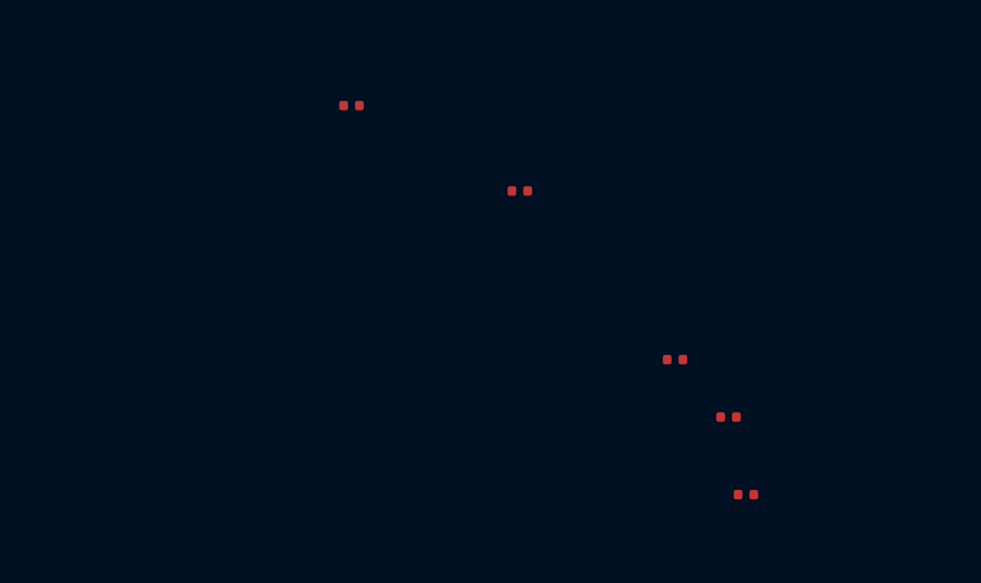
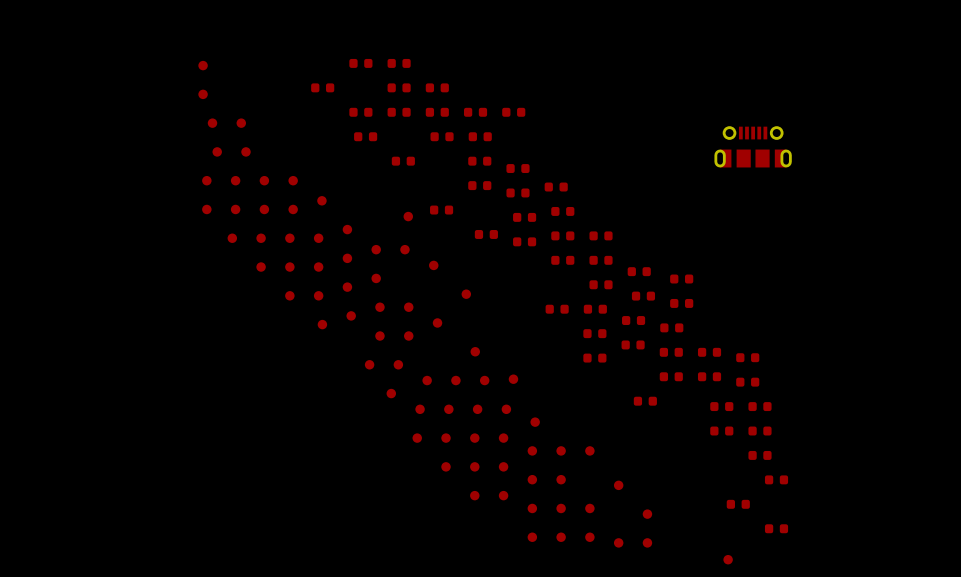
part: none -> (360, 63)
part: none -> (399, 63)
part: none -> (203, 65)
part: none -> (322, 87)
part: none -> (399, 87)
part: none -> (437, 87)
part: none -> (203, 94)
part: none -> (360, 112)
part: none -> (399, 112)
part: none -> (437, 112)
part: none -> (475, 112)
part: none -> (513, 112)
part: none -> (212, 123)
part: none -> (241, 123)
part: none -> (442, 136)
part: none -> (480, 136)
part: none -> (753, 146)
part: none -> (217, 151)
part: none -> (245, 151)
part: none -> (403, 161)
part: none -> (479, 161)
part: none -> (518, 168)
part: none -> (206, 180)
part: none -> (235, 180)
part: none -> (264, 180)
part: none -> (293, 180)
part: none -> (479, 185)
part: none -> (556, 187)
part: none -> (518, 192)
part: none -> (321, 200)
part: none -> (206, 209)
part: none -> (235, 209)
part: none -> (264, 209)
part: none -> (293, 209)
part: none -> (441, 210)
part: none -> (562, 211)
part: none -> (408, 216)
part: none -> (347, 229)
part: none -> (486, 234)
part: none -> (562, 235)
part: none -> (601, 235)
part: none -> (232, 238)
part: none -> (261, 238)
part: none -> (289, 238)
part: none -> (318, 238)
part: none -> (524, 241)
part: none -> (376, 249)
part: none -> (404, 249)
part: none -> (347, 258)
part: none -> (562, 260)
part: none -> (601, 260)
part: none -> (433, 265)
part: none -> (261, 267)
part: none -> (289, 267)
part: none -> (318, 267)
part: none -> (639, 271)
part: none -> (376, 278)
part: none -> (681, 279)
part: none -> (601, 284)
part: none -> (347, 287)
part: none -> (466, 294)
part: none -> (289, 295)
part: none -> (318, 295)
part: none -> (643, 296)
part: none -> (681, 303)
part: none -> (379, 307)
part: none -> (408, 307)
part: none -> (557, 309)
part: none -> (595, 309)
part: none -> (351, 315)
part: none -> (633, 320)
part: none -> (437, 322)
part: none -> (322, 324)
part: none -> (671, 327)
part: none -> (594, 333)
part: none -> (379, 336)
part: none -> (408, 336)
part: none -> (633, 344)
part: none -> (475, 351)
part: none -> (671, 352)
part: none -> (709, 352)
part: none -> (594, 358)
part: none -> (747, 357)
part: none -> (369, 364)
part: none -> (398, 364)
part: none -> (709, 376)
part: none -> (513, 379)
part: none -> (427, 380)
part: none -> (455, 380)
part: none -> (484, 380)
part: none -> (747, 382)
part: none -> (391, 393)
part: none -> (645, 401)
part: none -> (721, 406)
part: none -> (760, 406)
part: none -> (420, 409)
part: none -> (448, 409)
part: none -> (477, 409)
part: none -> (506, 409)
part: none -> (535, 422)
part: none -> (760, 431)
part: none -> (417, 438)
part: none -> (446, 438)
part: none -> (474, 438)
part: none -> (503, 438)
part: none -> (532, 450)
part: none -> (561, 450)
part: none -> (589, 450)
part: none -> (760, 455)
part: none -> (446, 466)
part: none -> (474, 466)
part: none -> (503, 466)
part: none -> (532, 479)
part: none -> (561, 479)
part: none -> (776, 479)
part: none -> (618, 485)
part: none -> (474, 495)
part: none -> (503, 495)
part: none -> (532, 508)
part: none -> (561, 508)
part: none -> (589, 508)
part: none -> (647, 514)
part: none -> (776, 528)
part: none -> (532, 537)
part: none -> (561, 537)
part: none -> (589, 537)
part: none -> (618, 542)
part: none -> (647, 542)
part: none -> (728, 559)

